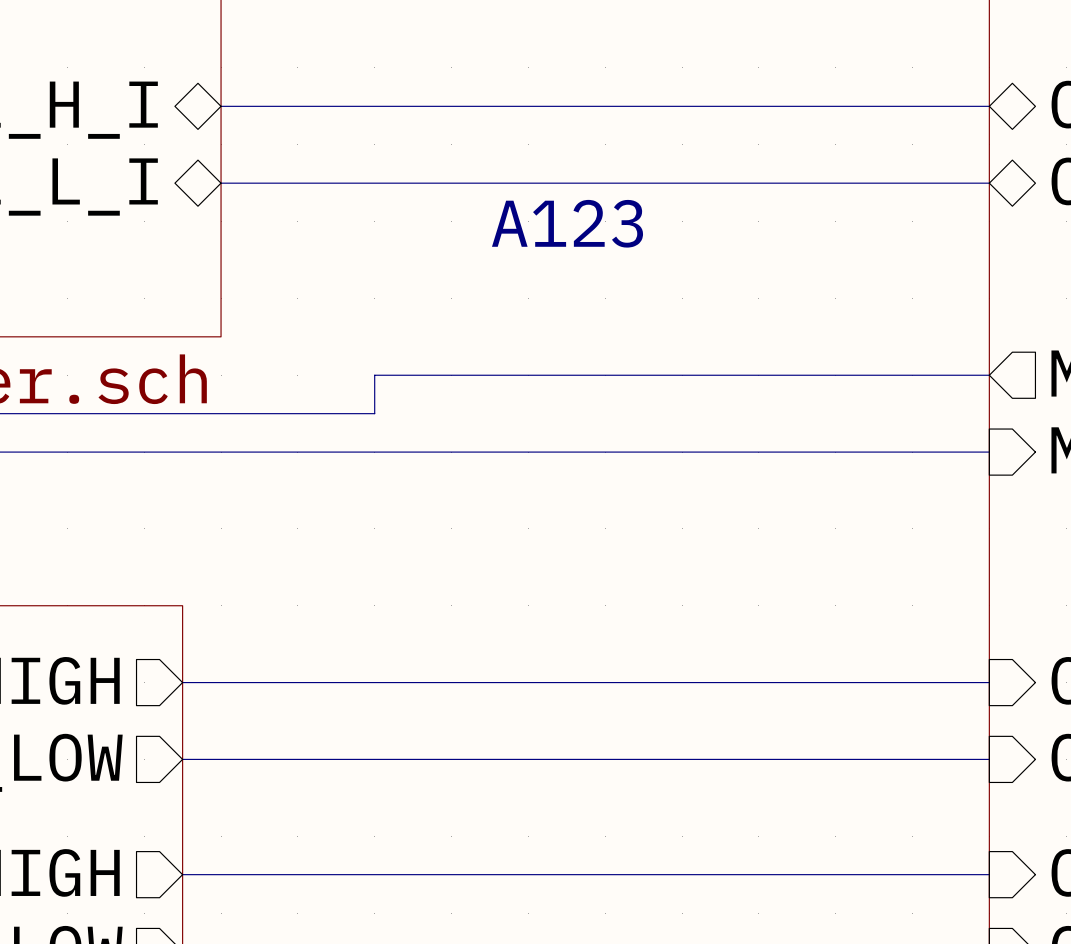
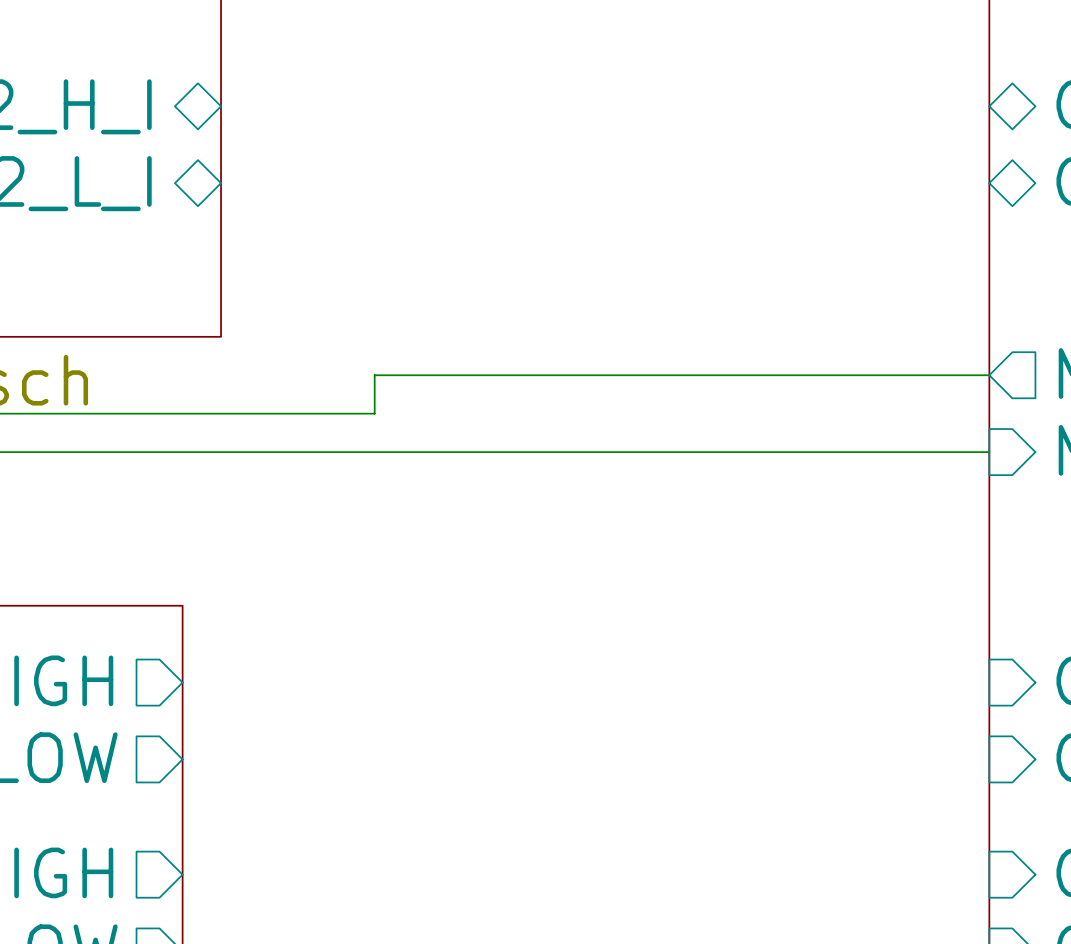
wire: (221, 106) (989, 106) -> none
wire: (221, 183) (989, 183) -> none
text: A123 (567, 223) -> none
wire: (182, 682) (989, 682) -> none
wire: (182, 759) (989, 759) -> none
wire: (182, 874) (989, 874) -> none

